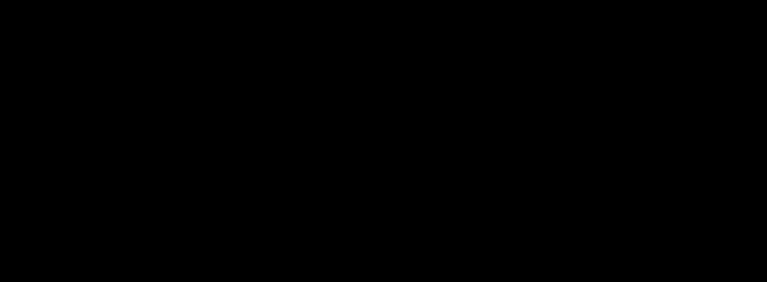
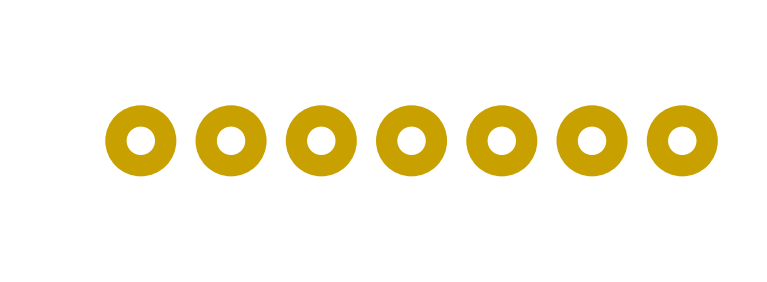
part: none -> (411, 140)

